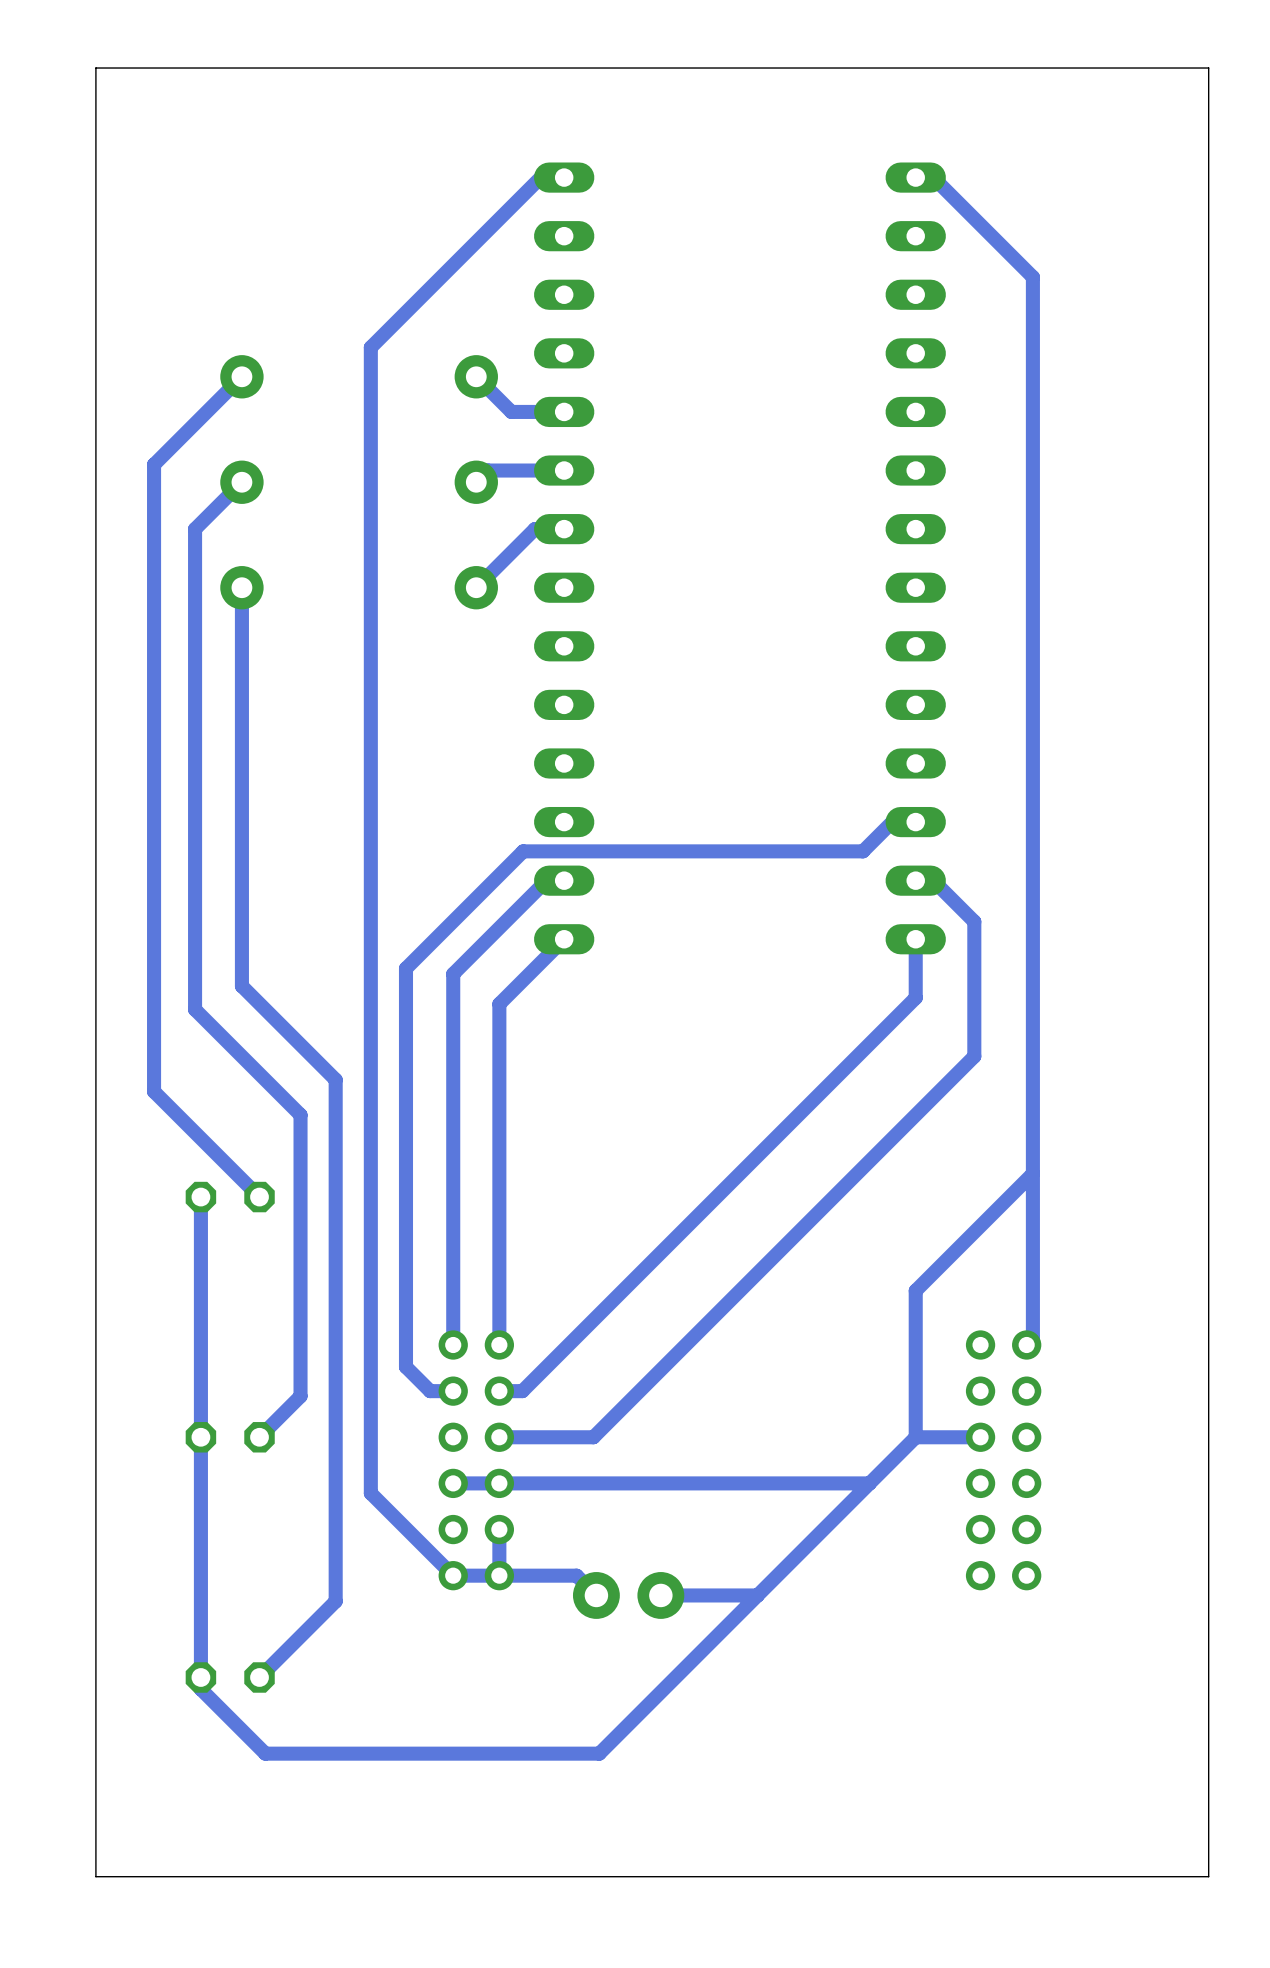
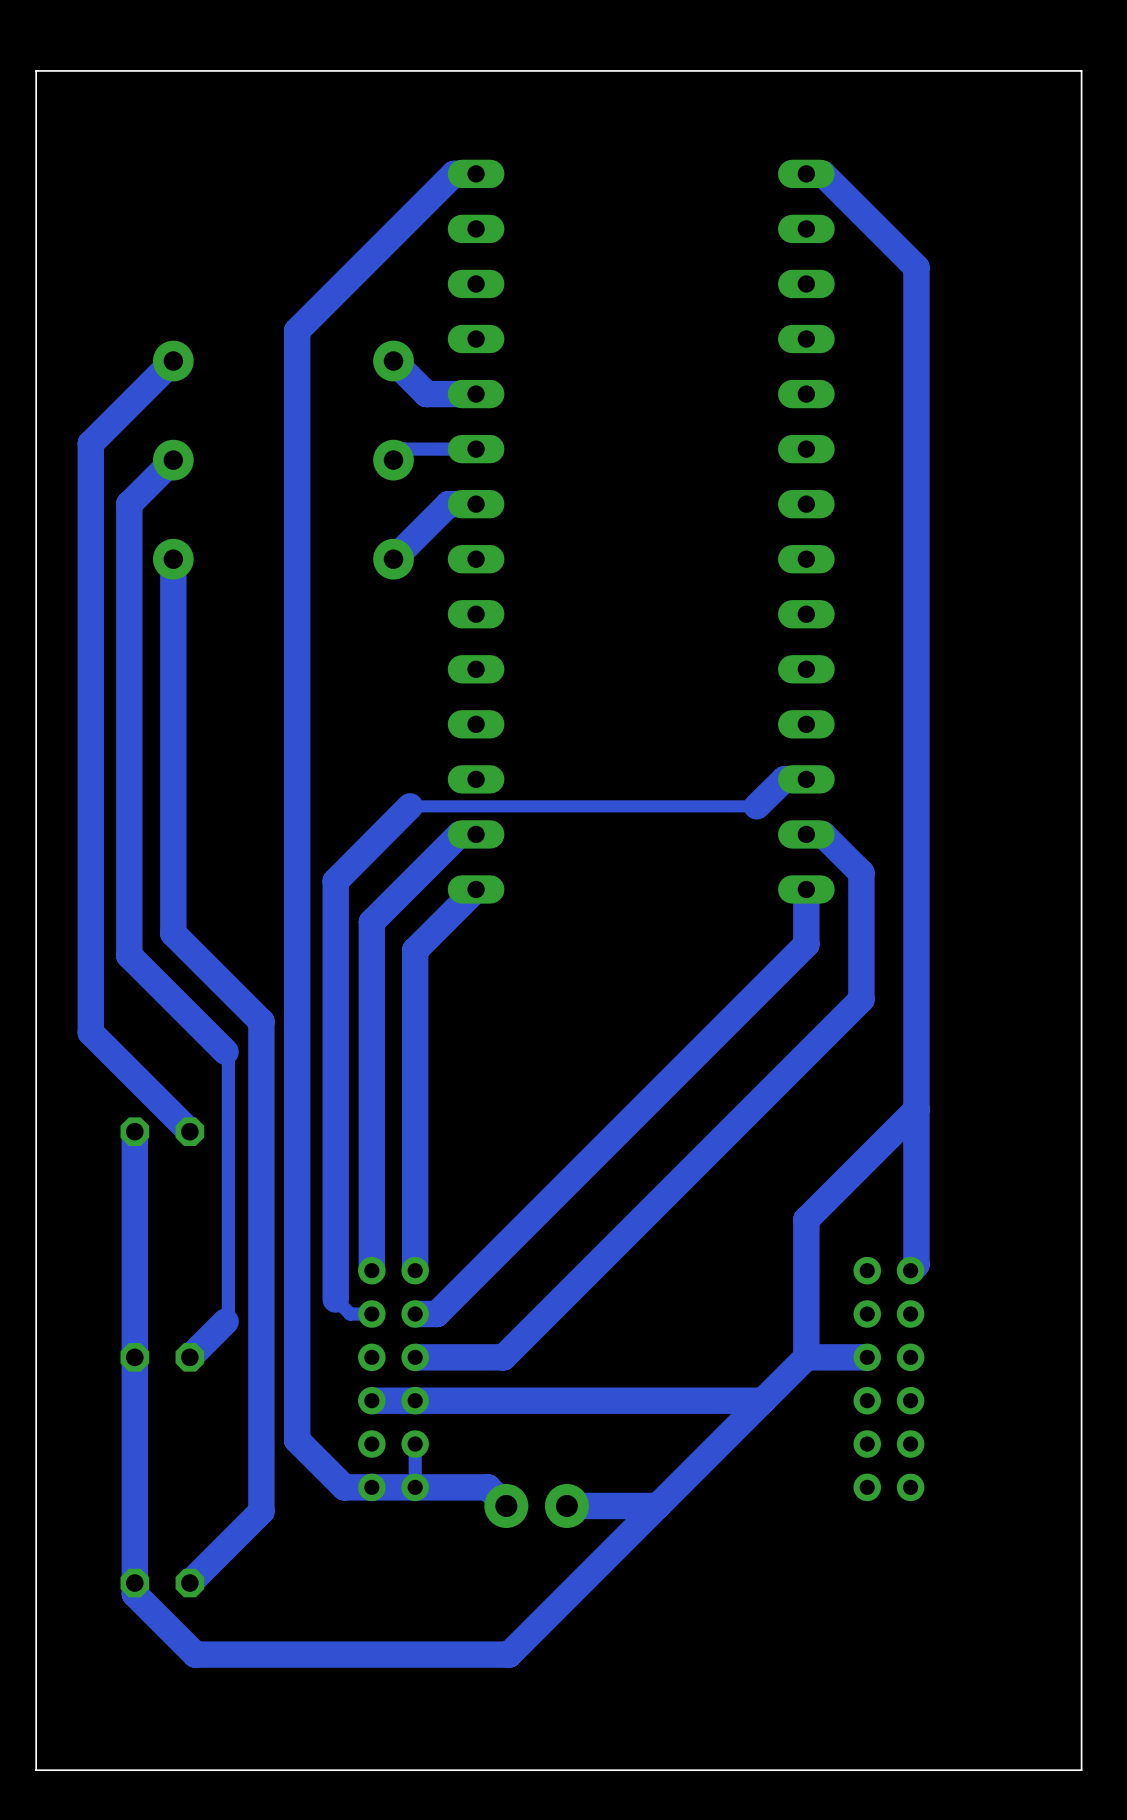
track width: thin (564, 177) (540, 177) (373, 344) -> thick (476, 173) (454, 173) (297, 330)
track width: thin (915, 177) (933, 177) (1032, 277) (1032, 1338) (1026, 1345) -> thick (806, 173) (822, 173) (916, 267) (916, 1264) (910, 1270)
track: (373, 344) (370, 347) (370, 1493) (453, 1575) -> (297, 330) (297, 1440) (344, 1487) (371, 1487)
track width: thin (241, 376) (154, 464) (154, 1091) (259, 1197) -> thick (173, 361) (90, 443) (90, 1032) (189, 1131)
track width: thin (476, 376) (511, 411) (564, 411) -> thick (393, 361) (426, 394) (476, 394)
track width: thin (241, 482) (195, 529) (195, 1009) (297, 1112) -> thick (173, 460) (129, 504) (129, 955) (225, 1051)
track width: thin (564, 529) (534, 529) (476, 587) -> thick (476, 504) (448, 504) (393, 559)
track width: thin (241, 587) (241, 986) (335, 1079) (335, 1601) (259, 1677) -> thick (173, 559) (173, 933) (261, 1021) (261, 1511) (189, 1583)
track: (892, 822) (862, 851) (523, 851) (405, 968) (405, 1366) (414, 1375) -> (784, 779) (756, 806) (410, 806) (335, 881) (335, 1299)
track width: thin (564, 880) (546, 880) (453, 974) (453, 1345) -> thick (476, 834) (459, 834) (371, 922) (371, 1270)
track width: thin (915, 880) (933, 880) (974, 921) (974, 1056) (593, 1437) (499, 1437) -> thick (806, 834) (822, 834) (861, 872) (861, 999) (503, 1357) (415, 1357)
track width: thin (564, 939) (499, 1004) (499, 1345) -> thick (476, 889) (415, 950) (415, 1270)
track width: thin (915, 939) (915, 997) (522, 1391) (499, 1391) -> thick (806, 889) (806, 944) (436, 1314) (415, 1314)
track width: thin (1032, 1173) (915, 1290) (915, 1437) -> thick (916, 1109) (806, 1219) (806, 1357)
track width: thin (200, 1197) (200, 1689) (265, 1753) (599, 1753) (915, 1437) -> thick (134, 1131) (134, 1594) (195, 1654) (509, 1654) (806, 1357)
track width: thin (297, 1399) (259, 1437) -> thick (225, 1321) (189, 1357)
track width: thin (980, 1437) (915, 1437) -> thick (867, 1357) (806, 1357)
track width: thin (869, 1483) (453, 1483) -> thick (763, 1400) (371, 1400)
track width: thin (453, 1575) (576, 1575) (596, 1595) -> thick (371, 1487) (487, 1487) (506, 1505)
track width: thin (757, 1595) (660, 1595) -> thick (657, 1505) (566, 1505)

